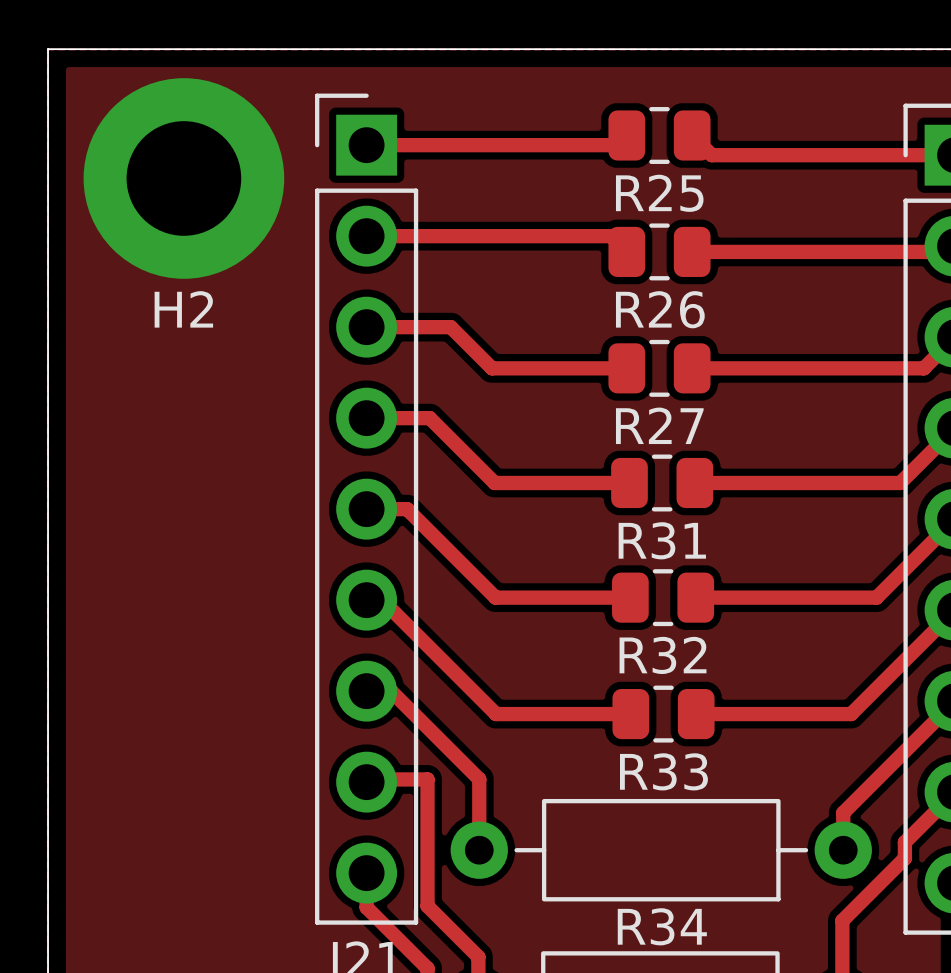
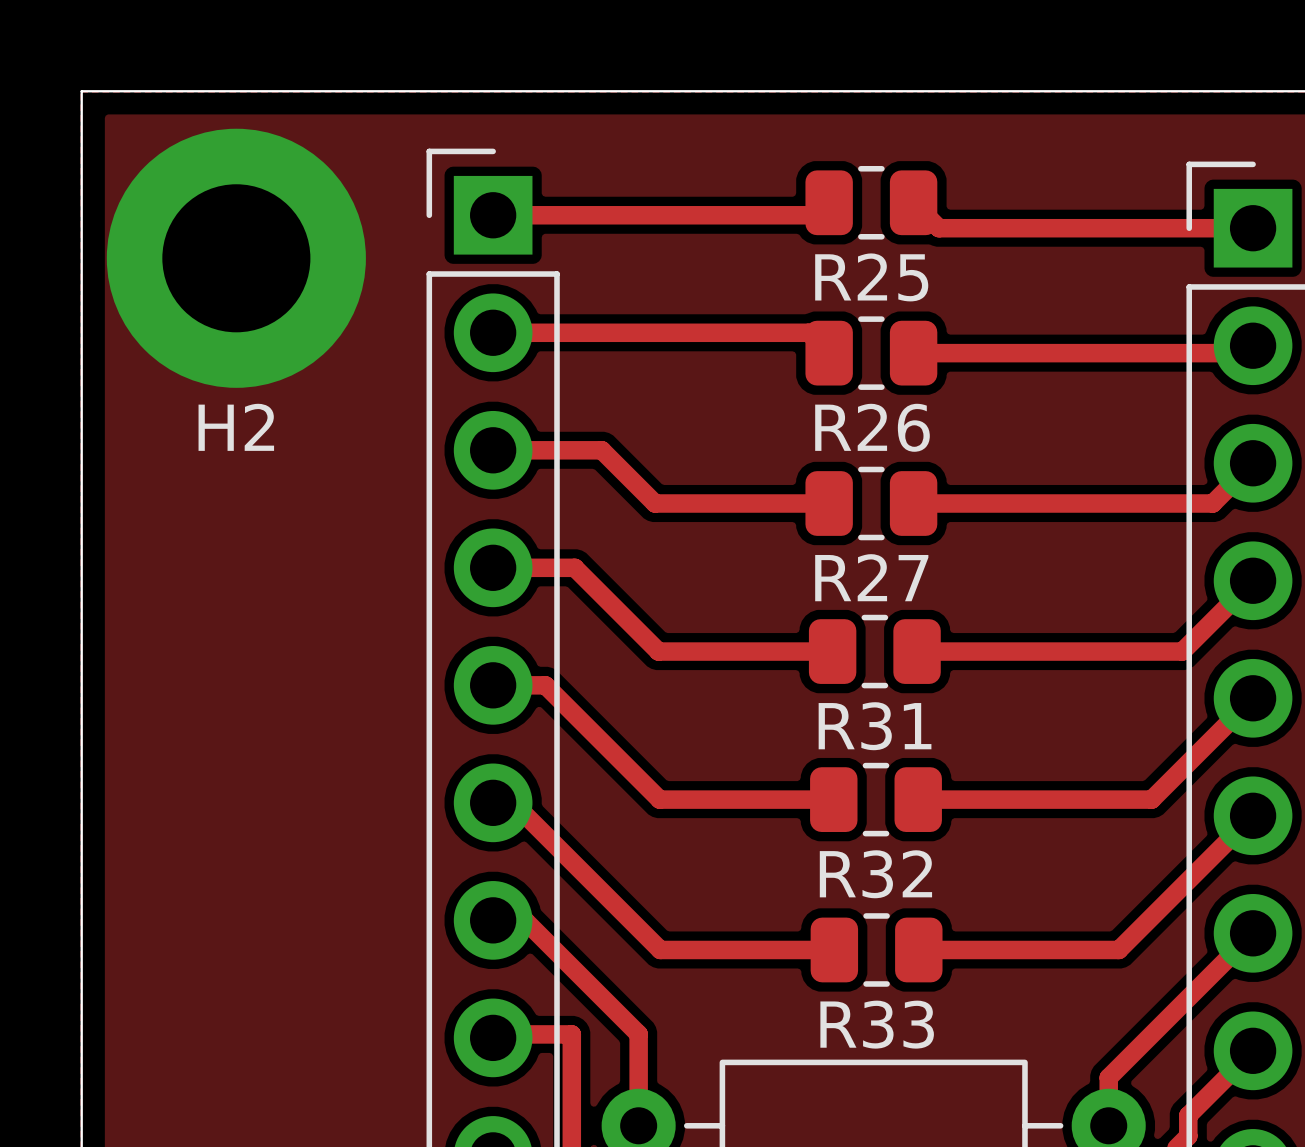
H2 position: (183, 178) -> (236, 258)

